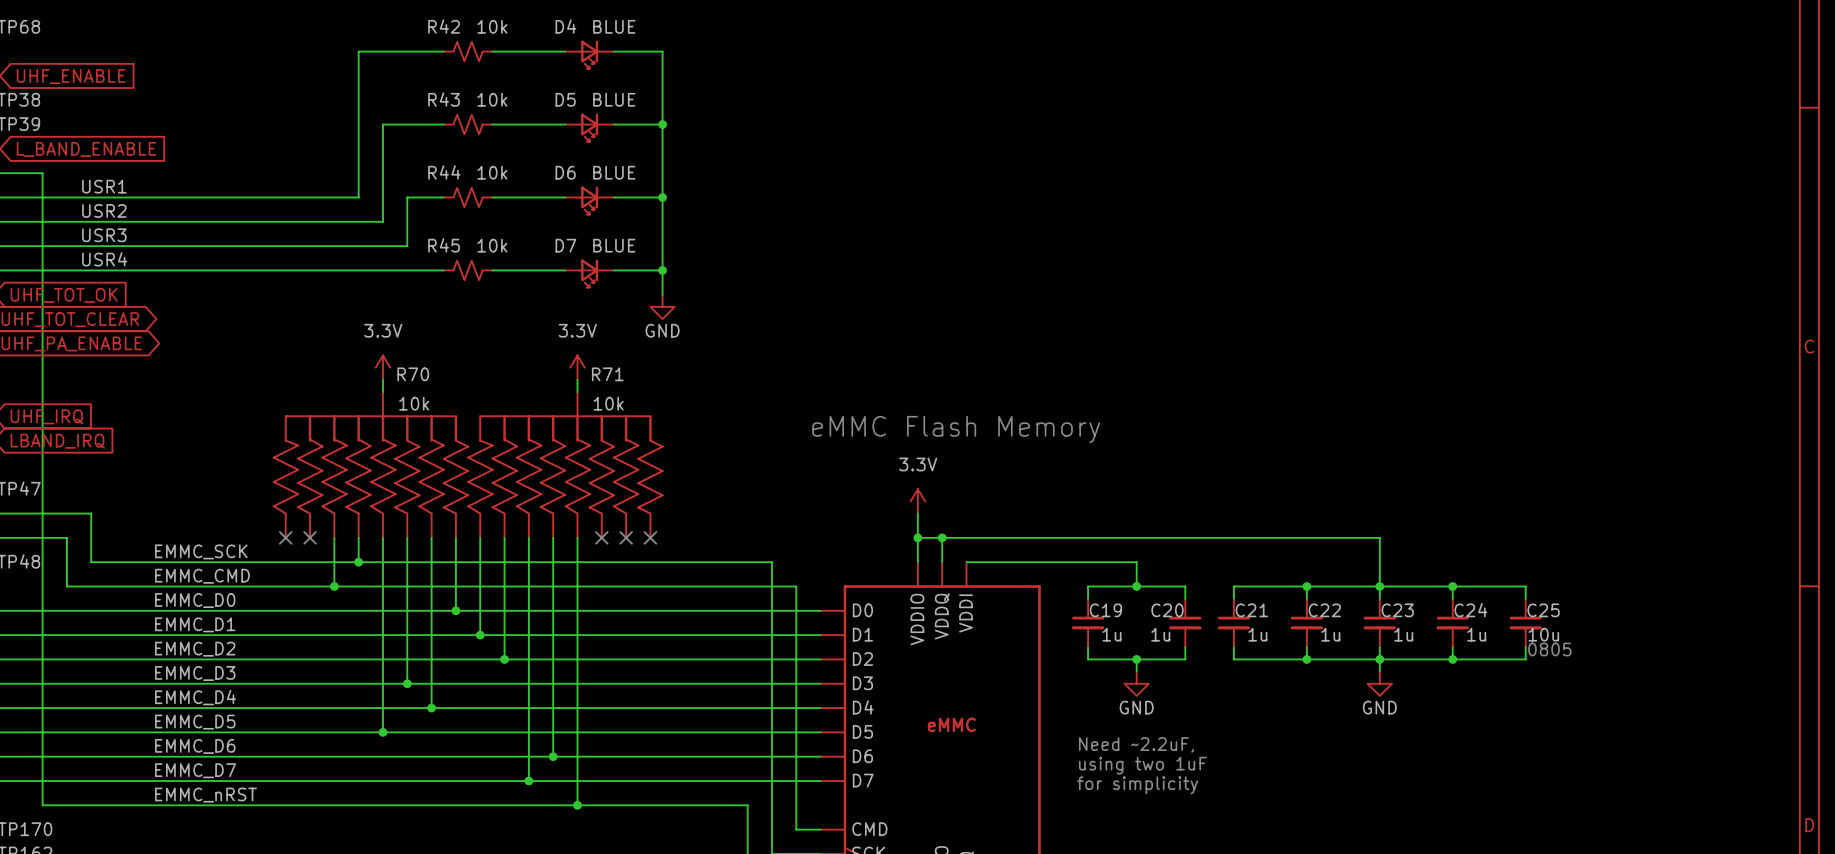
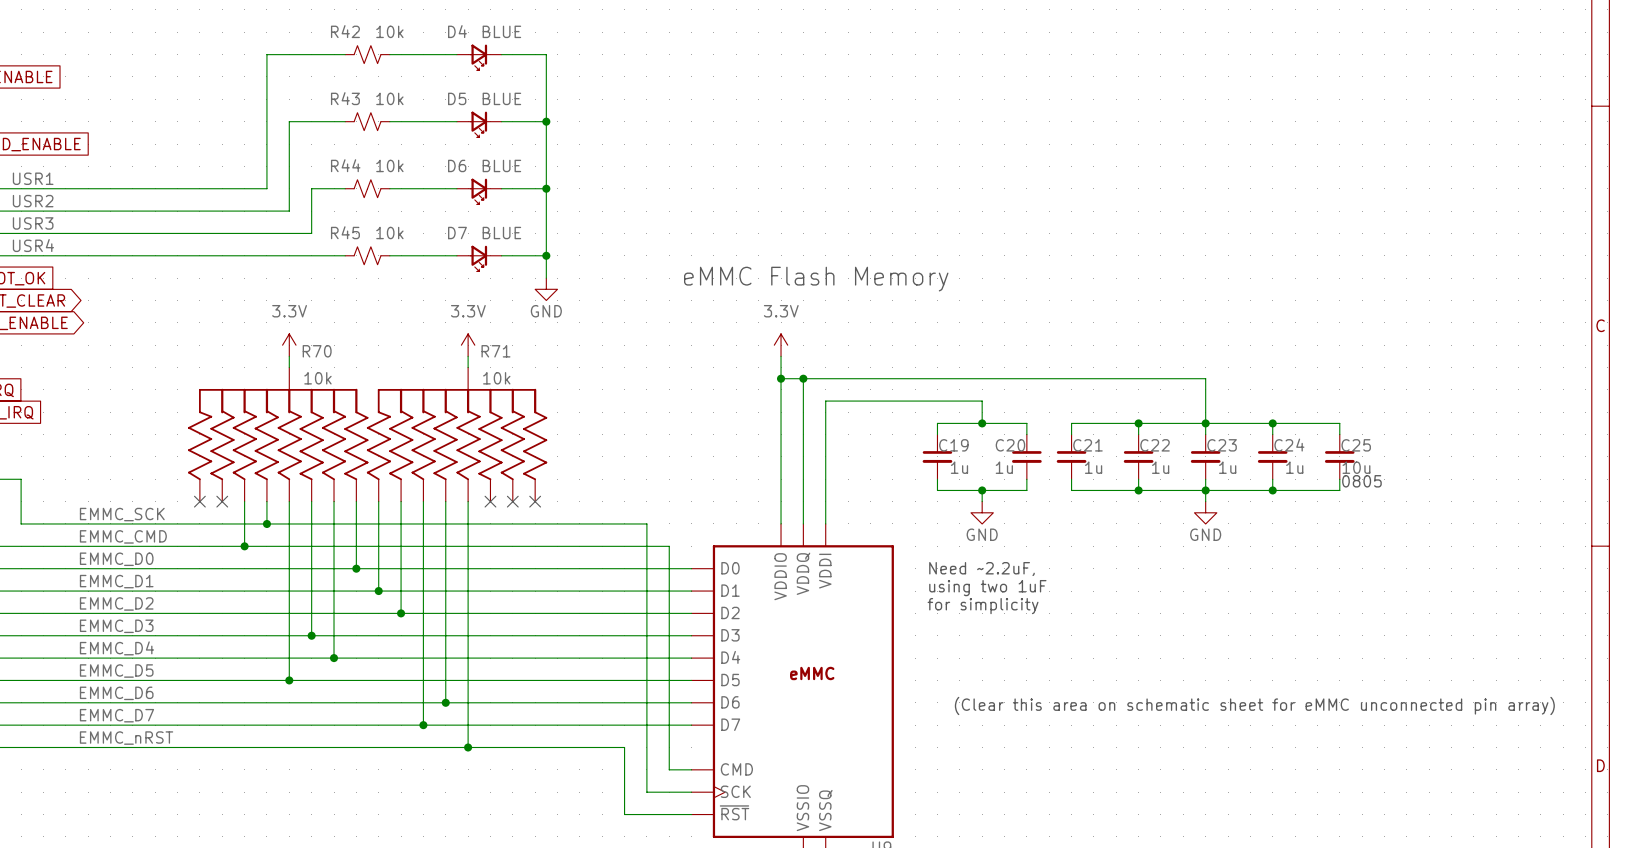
wire: none -> (781, 356) (781, 479)
junction: none -> (781, 378)
wire: none -> (803, 378) (803, 501)
junction: none -> (803, 378)
text position: eMMC Flash Memory (956, 429) -> eMMC Flash Memory (816, 279)
junction: none -> (982, 423)
junction: none -> (1138, 423)
junction: none -> (1205, 423)
junction: none -> (1272, 423)
power symbol position: 3.3V (917, 501) -> 3.3V (781, 345)
junction: none -> (982, 490)
junction: none -> (1138, 490)
junction: none -> (1205, 490)
junction: none -> (1272, 490)
wire: (917, 537) (1379, 537) (1379, 598) -> (781, 378) (1205, 378) (1205, 434)
junction: (917, 537) -> none
junction: (942, 537) -> none
wire: (966, 562) (1136, 562) (1136, 586) -> (825, 523) (825, 401) (982, 401) (982, 423)
junction: (1136, 586) -> none
wire: (1306, 586) (1306, 598) -> (1138, 423) (1138, 434)
junction: (1306, 586) -> none
junction: (1379, 586) -> none
wire: (1452, 586) (1452, 598) -> (1272, 423) (1272, 434)
junction: (1452, 586) -> none
wire: (1088, 598) (1088, 586) (1185, 586) (1185, 598) -> (937, 434) (937, 423) (1026, 423) (1026, 434)
wire: (1233, 598) (1233, 586) (1525, 586) (1525, 598) -> (1071, 434) (1071, 423) (1339, 423) (1339, 434)
C19 position: (1088, 622) -> (937, 456)
C20 position: (1185, 622) -> (1026, 456)
C21 position: (1233, 622) -> (1071, 456)
C22 position: (1306, 622) -> (1138, 456)
C23 position: (1379, 622) -> (1205, 456)
C24 position: (1452, 622) -> (1272, 456)
C25 position: (1525, 622) -> (1339, 456)
wire: (1088, 647) (1088, 659) (1185, 659) (1185, 647) -> (937, 479) (937, 490) (1026, 490) (1026, 479)
wire: (1233, 647) (1233, 659) (1525, 659) (1525, 647) -> (1071, 479) (1071, 490) (1339, 490) (1339, 479)
wire: (1306, 647) (1306, 659) -> (1138, 479) (1138, 490)
wire: (1379, 647) (1379, 671) -> (1205, 479) (1205, 501)
wire: (1452, 647) (1452, 659) -> (1272, 479) (1272, 490)
text position: 0805 (1549, 649) -> 0805 (1361, 481)
wire: (1136, 659) (1136, 671) -> (982, 490) (982, 501)
junction: (1136, 659) -> none
junction: (1306, 659) -> none
junction: (1379, 659) -> none
junction: (1452, 659) -> none
power symbol position: GND (1136, 683) -> GND (982, 512)
power symbol position: GND (1379, 683) -> GND (1205, 512)
text position: Need ~2.2uF, (1136, 744) -> Need ~2.2uF, (981, 569)
text: none -> (Clear this area on schematic sheet for eMMC unconnected pin array) (1254, 705)
text position: using two 1uF (1142, 765) -> using two 1uF (987, 588)
text position: for simplicity (1137, 785) -> for simplicity (983, 606)

